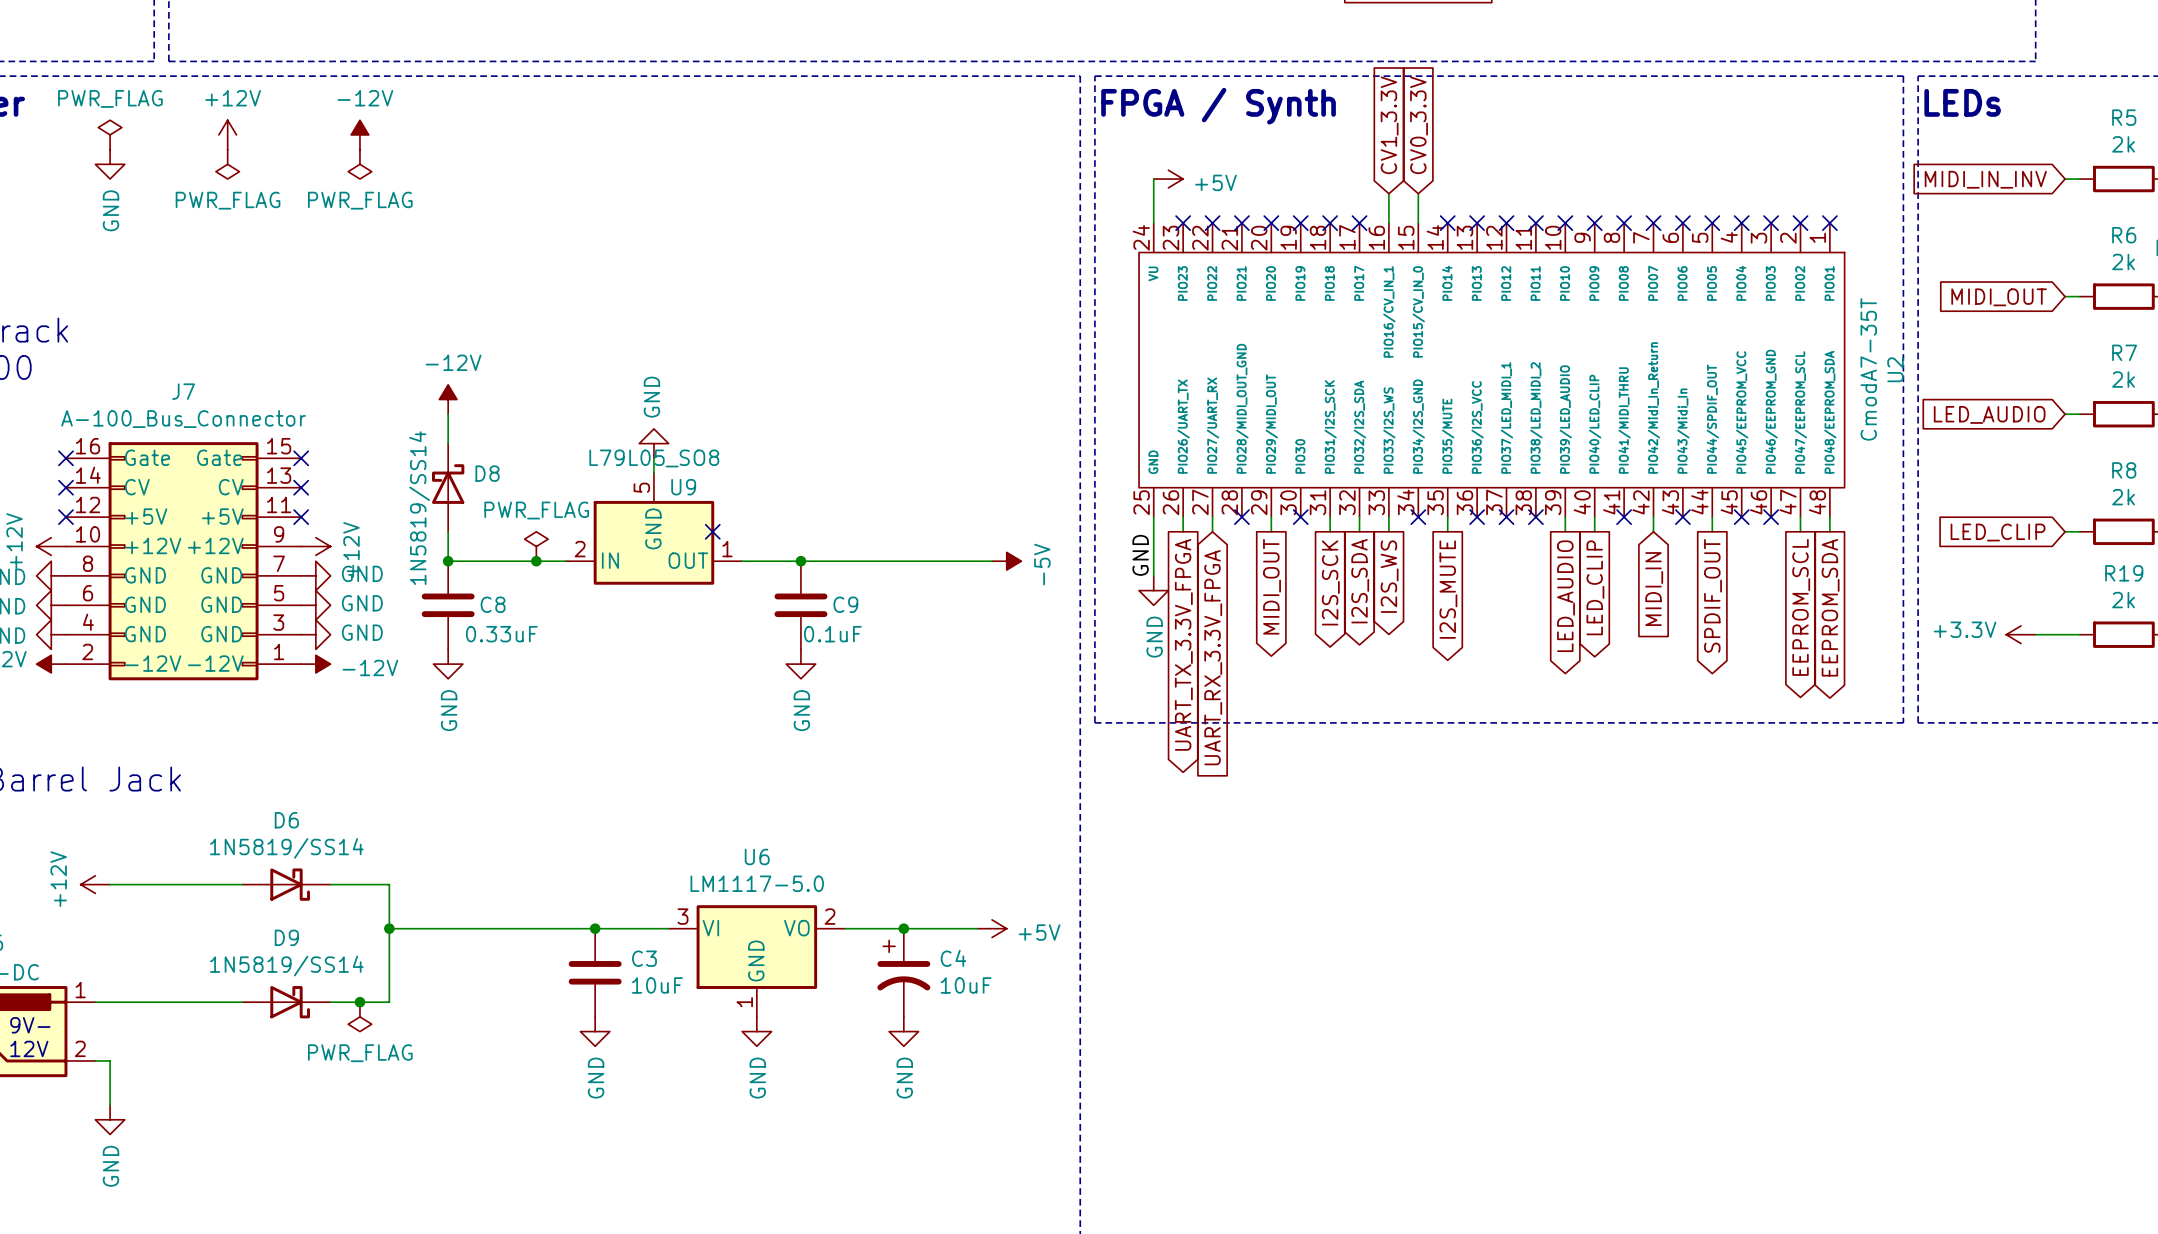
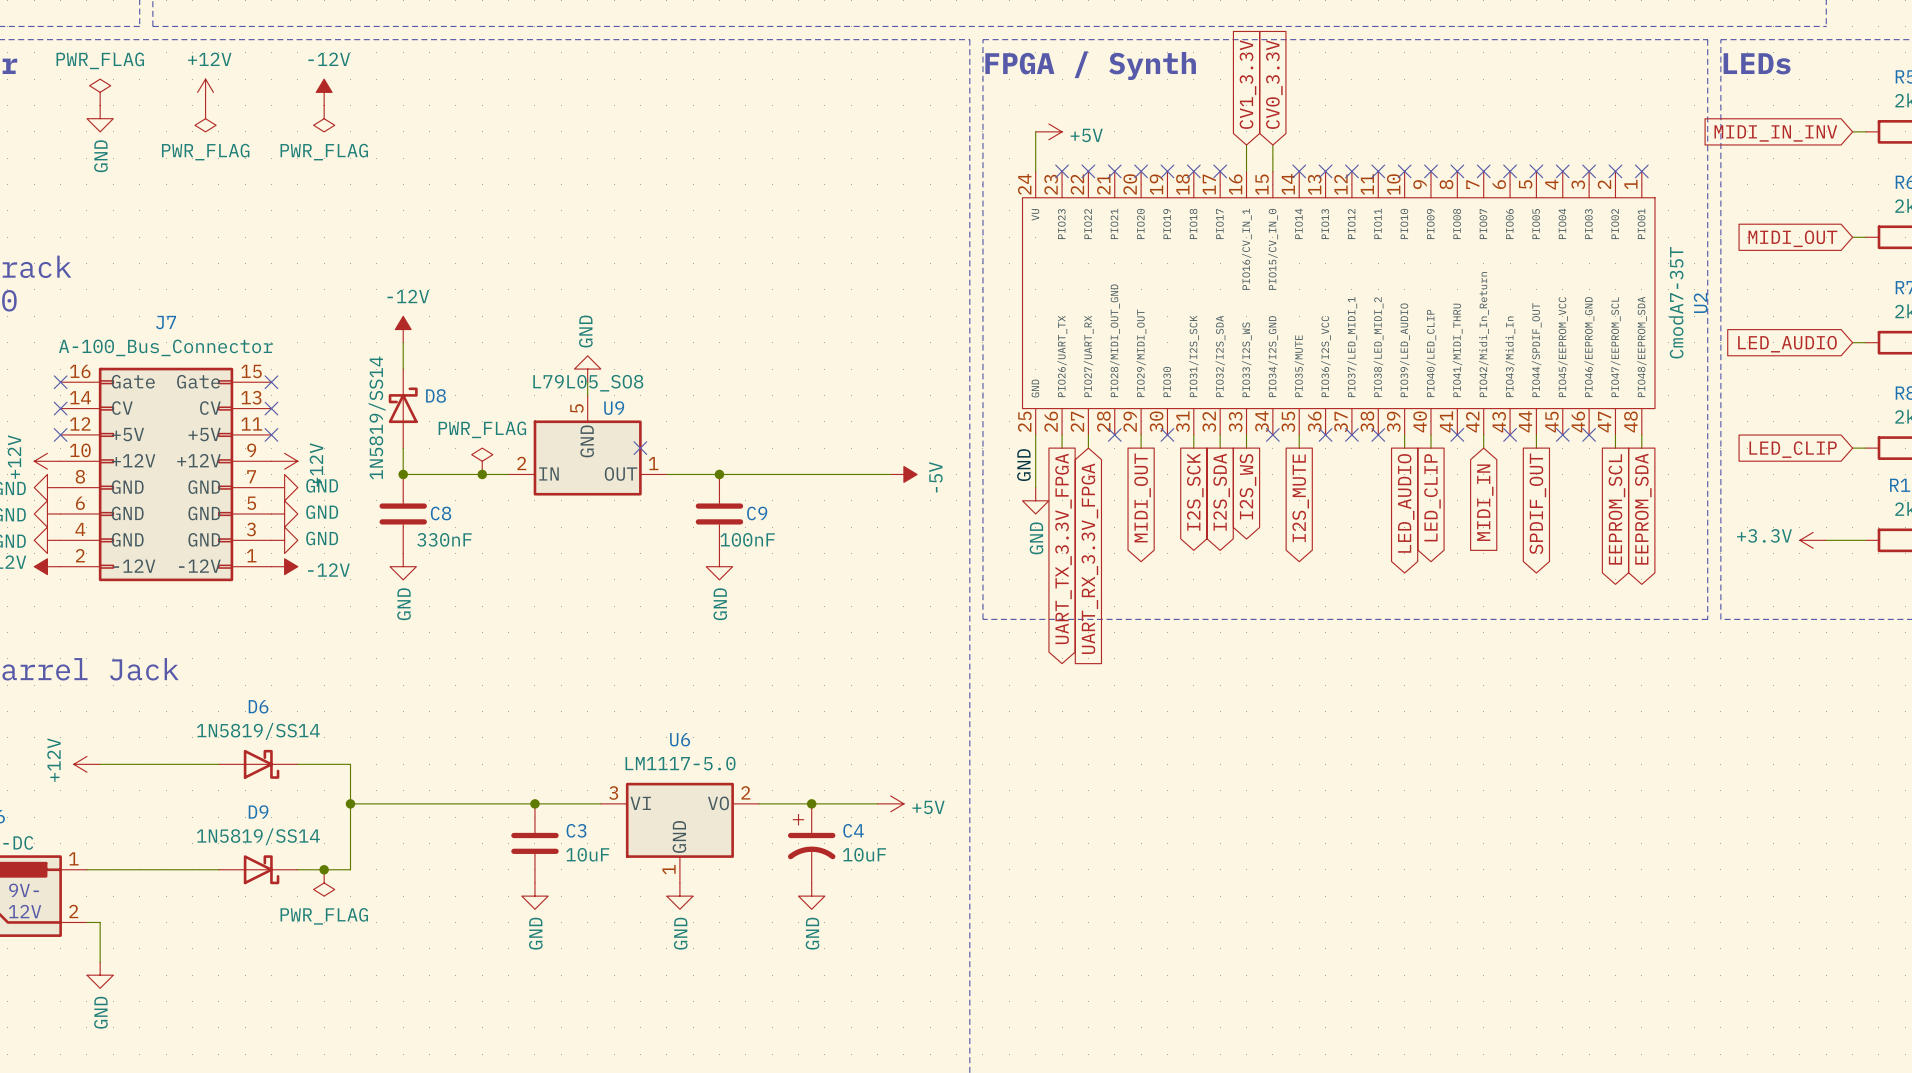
C8 value: 0.33uF (501, 634) -> 330nF (444, 539)
C9 value: 0.1uF (832, 634) -> 100nF (747, 539)

